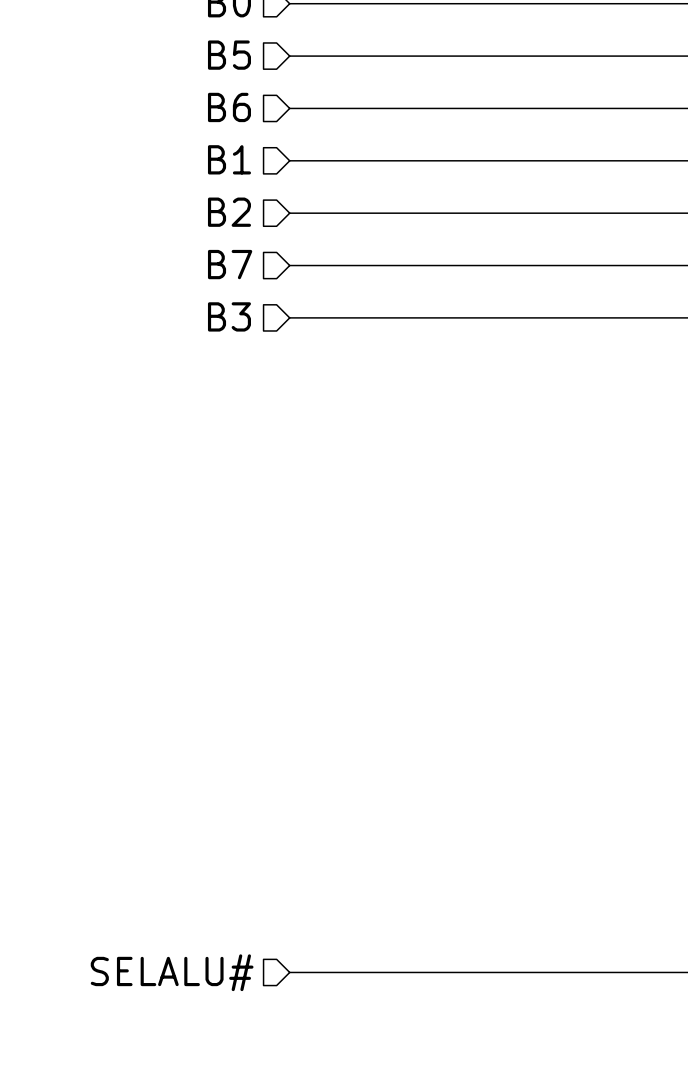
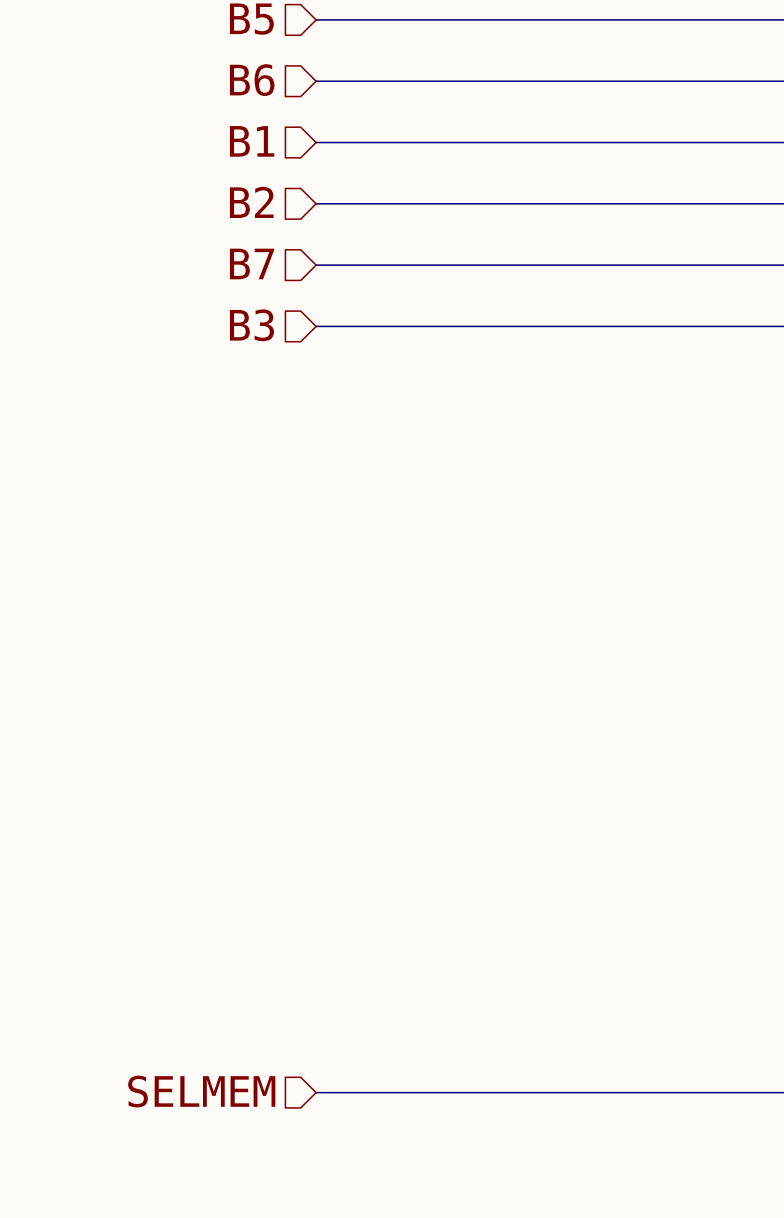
hierarchical label: SELALU# (172, 972) -> SELMEM (201, 1091)

